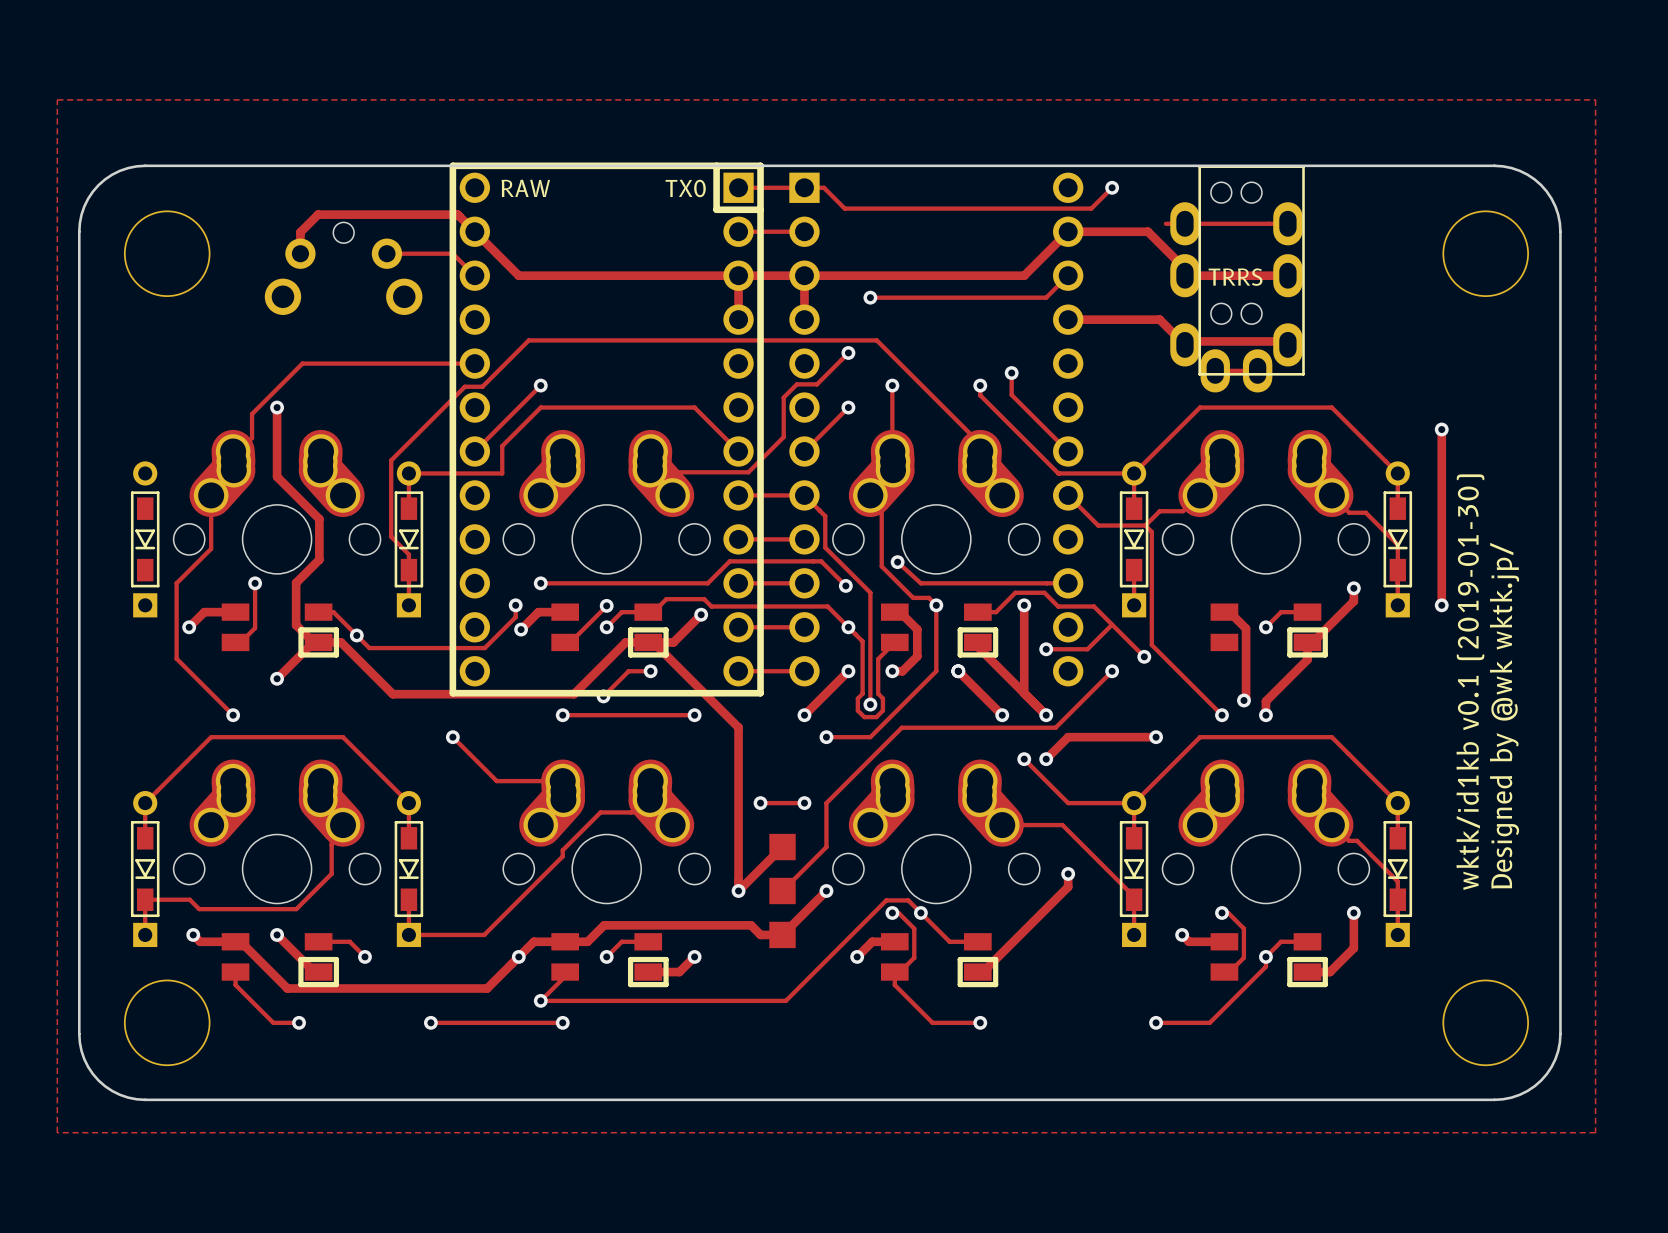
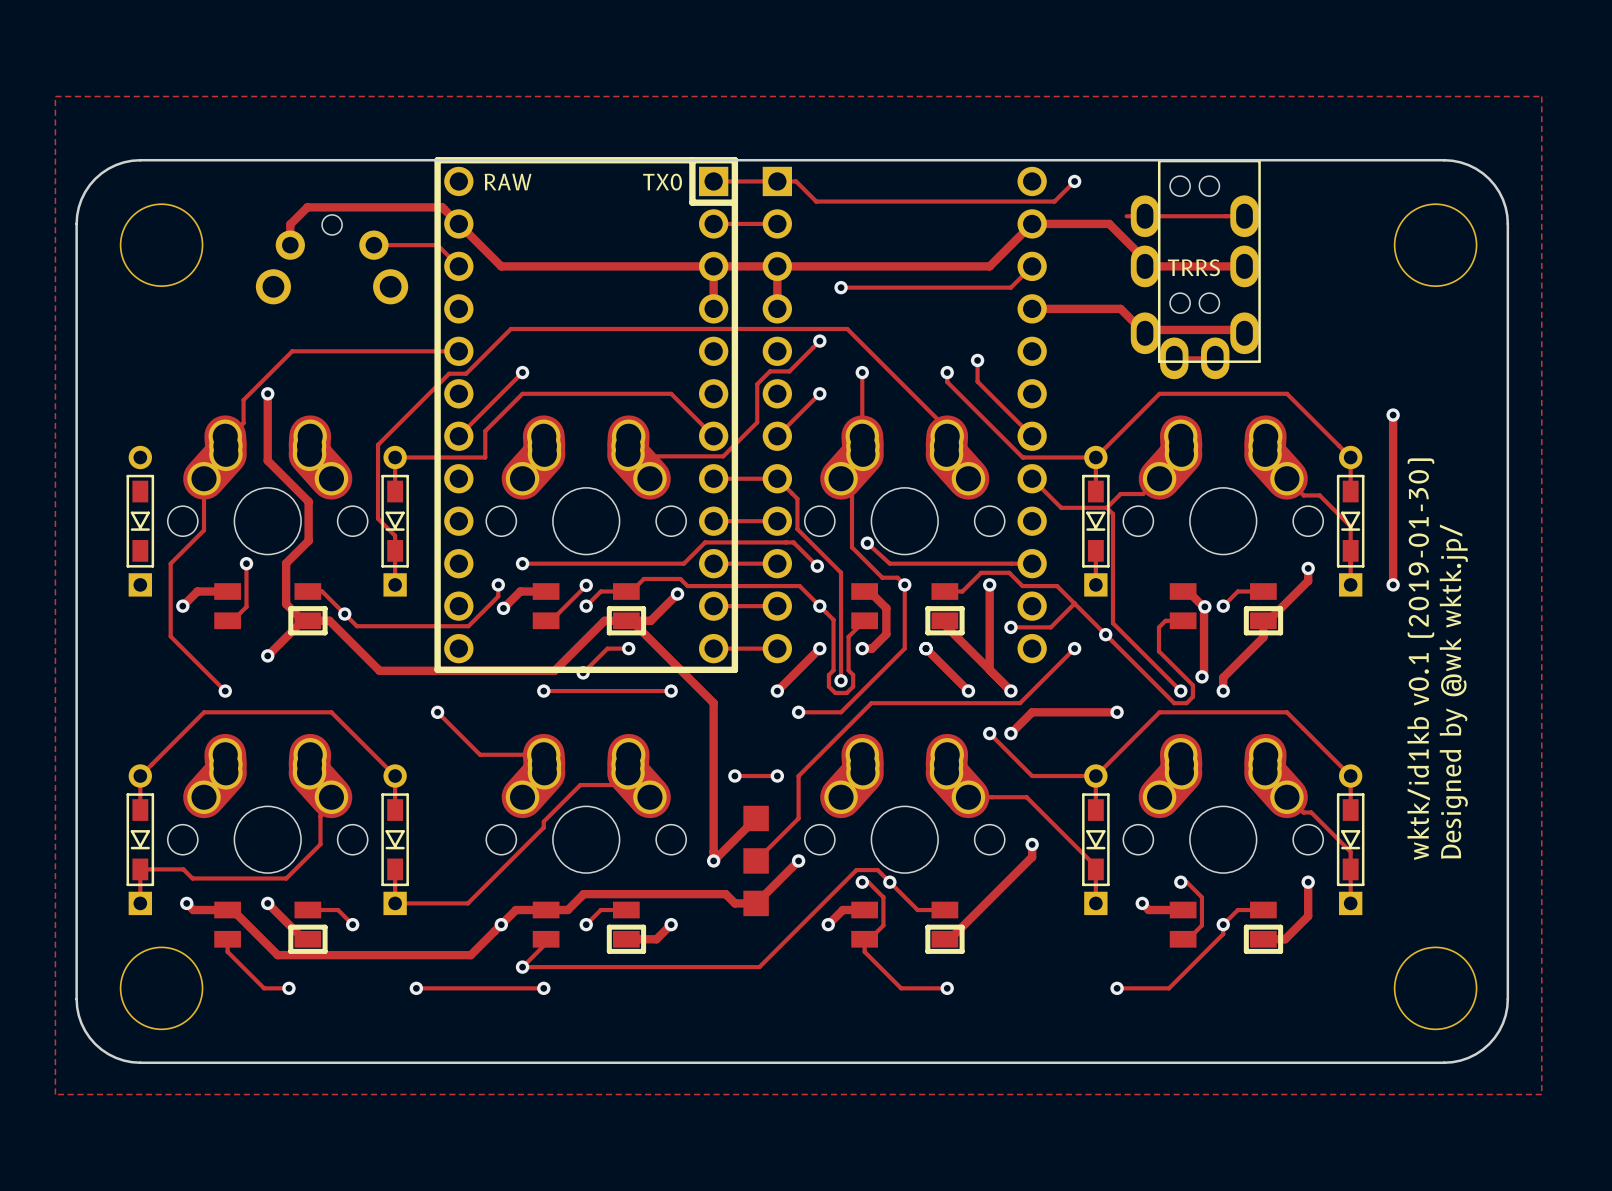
via: none -> (1204, 606)
track: none -> (1183, 620) (1165, 620) (1158, 627) (1158, 651) (1192, 685) (1192, 696) (1186, 703) (1174, 703) (1105, 634)

